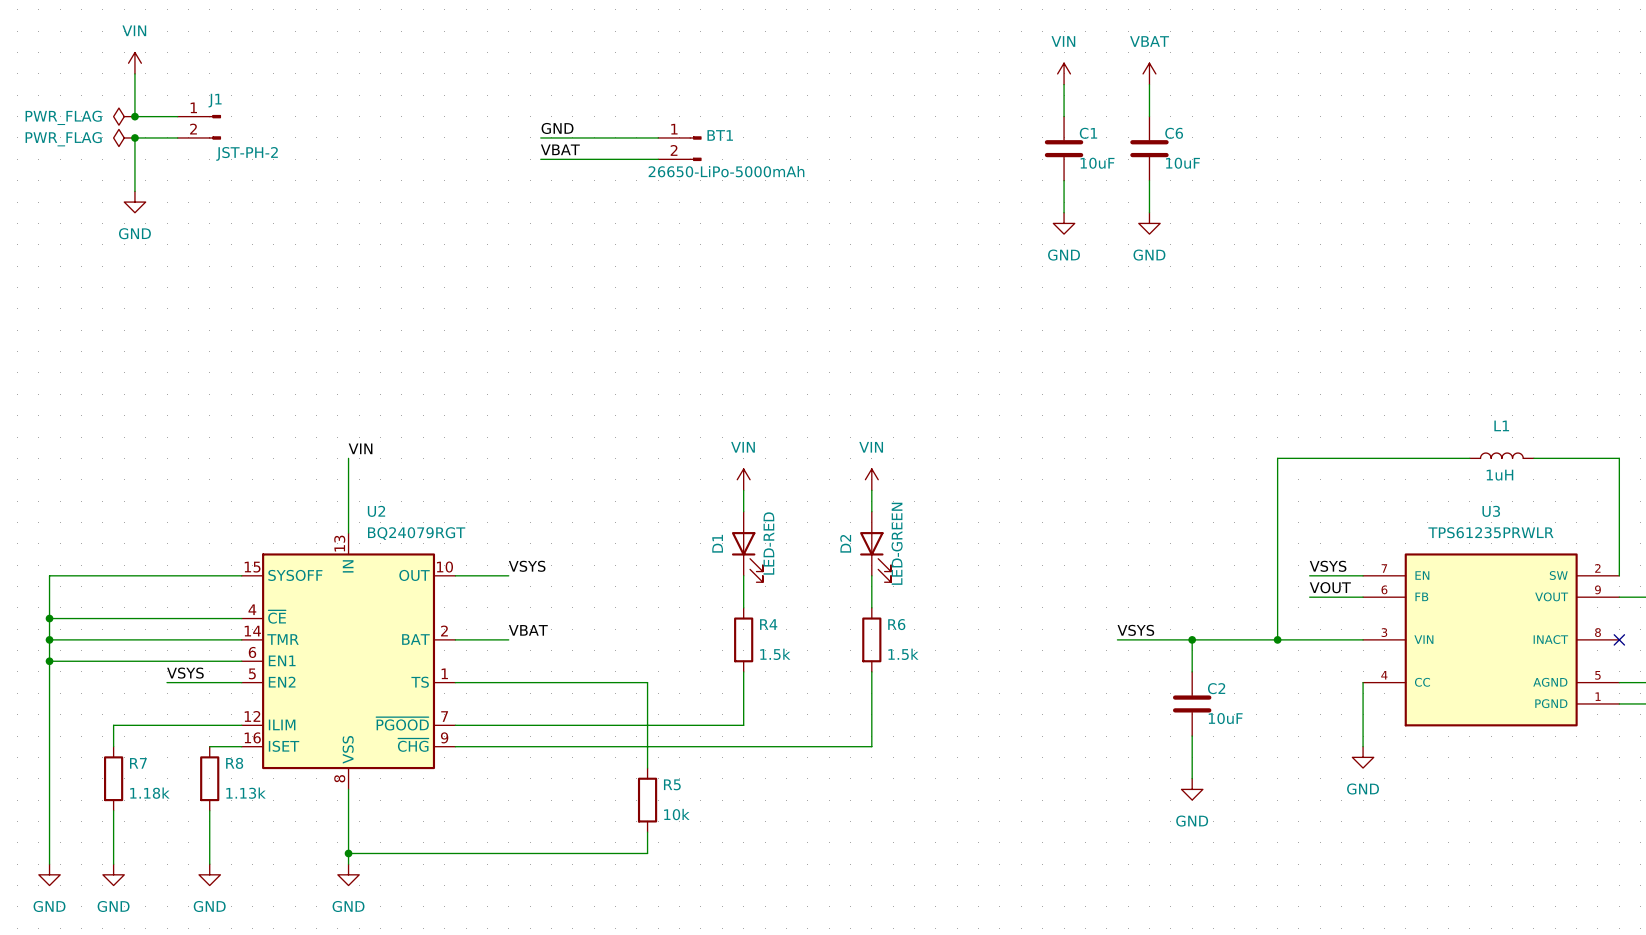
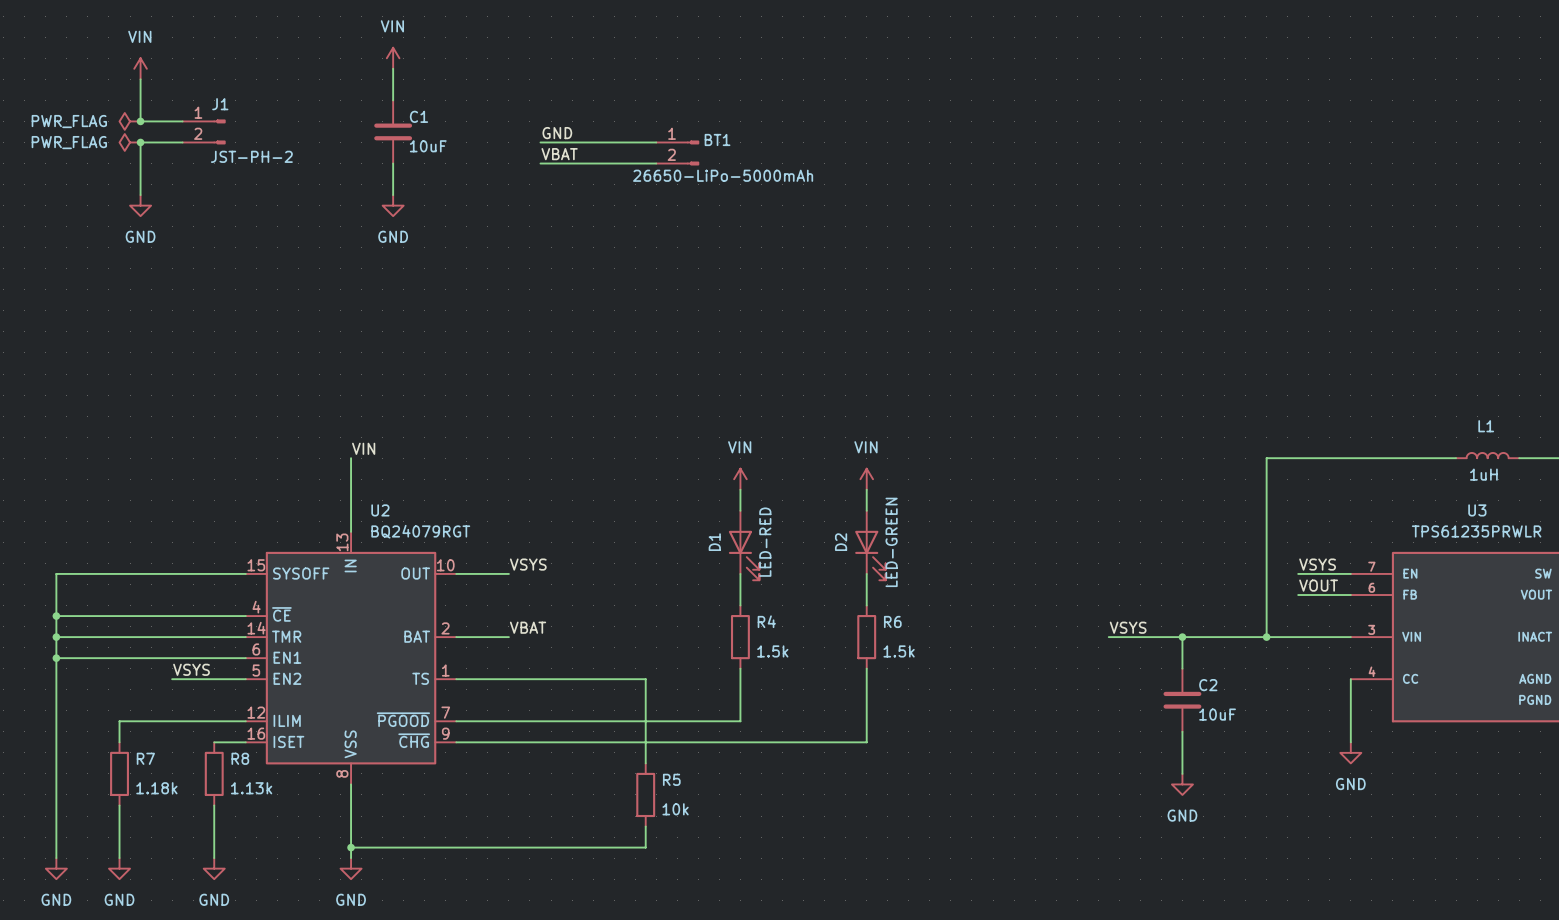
power symbol: none -> VIN (393, 58)
wire: none -> (393, 68) (393, 100)
power symbol: VIN (1064, 73) -> none
power symbol: VBAT (1149, 73) -> none
wire: (1064, 84) (1064, 116) -> none
wire: (1149, 84) (1149, 116) -> none
C1 position: (1064, 148) -> (393, 131)
C6: 10uF (1149, 148) -> none
wire: none -> (393, 163) (393, 195)
wire: (1064, 180) (1064, 212) -> none
wire: (1149, 180) (1149, 212) -> none
power symbol: none -> GND (393, 205)
power symbol: GND (1064, 223) -> none
power symbol: GND (1149, 223) -> none

